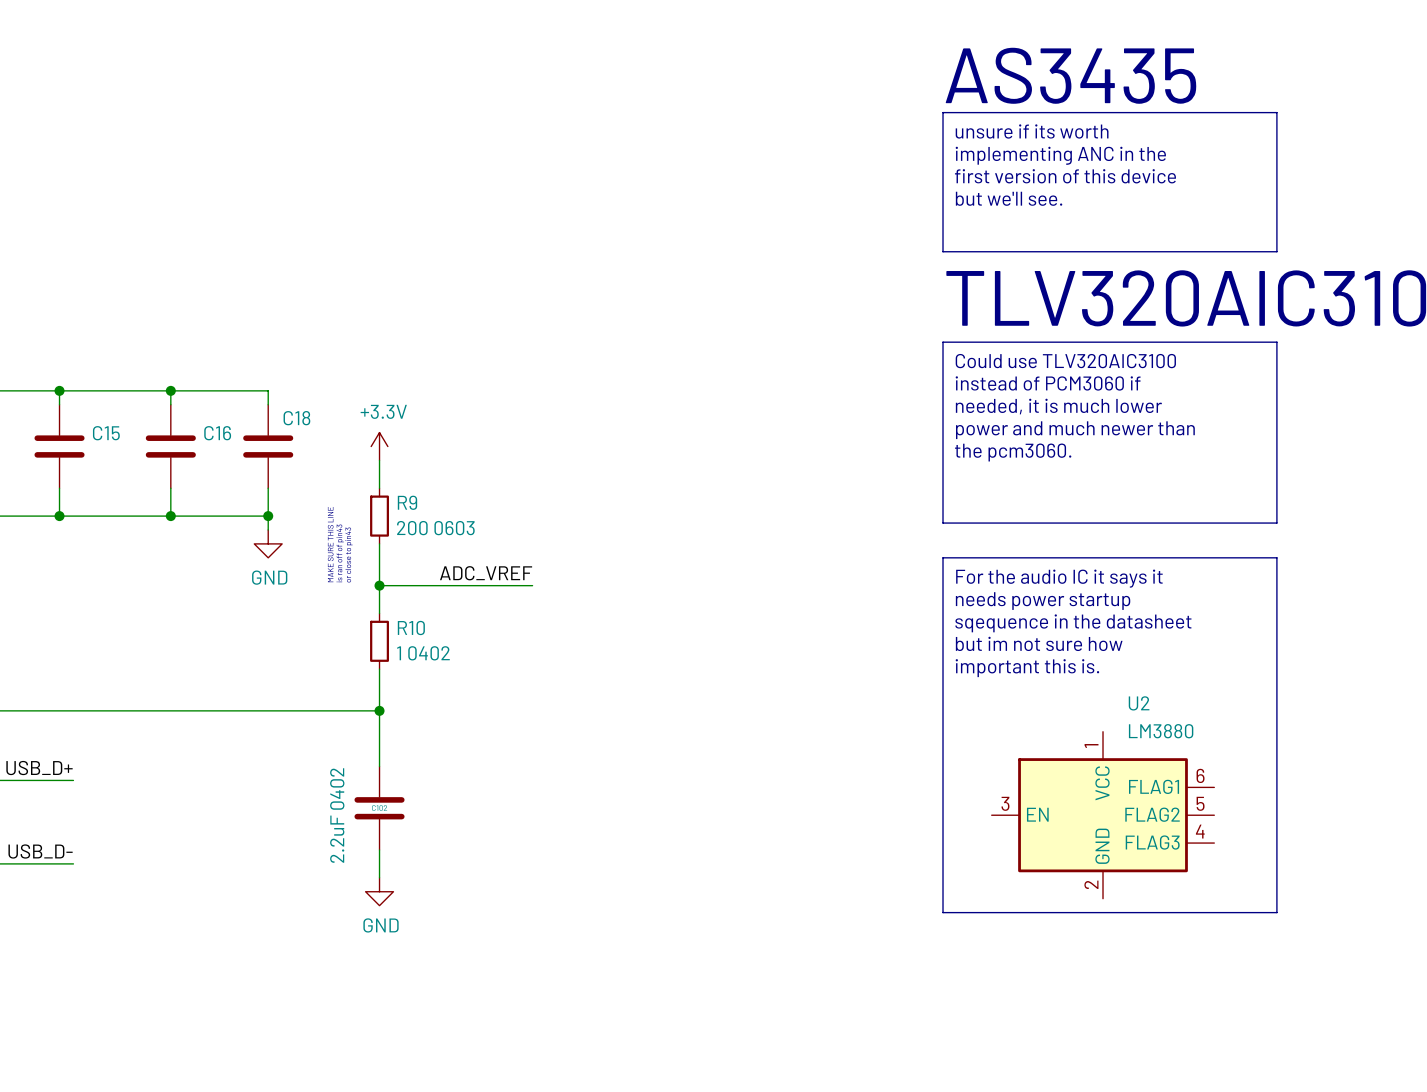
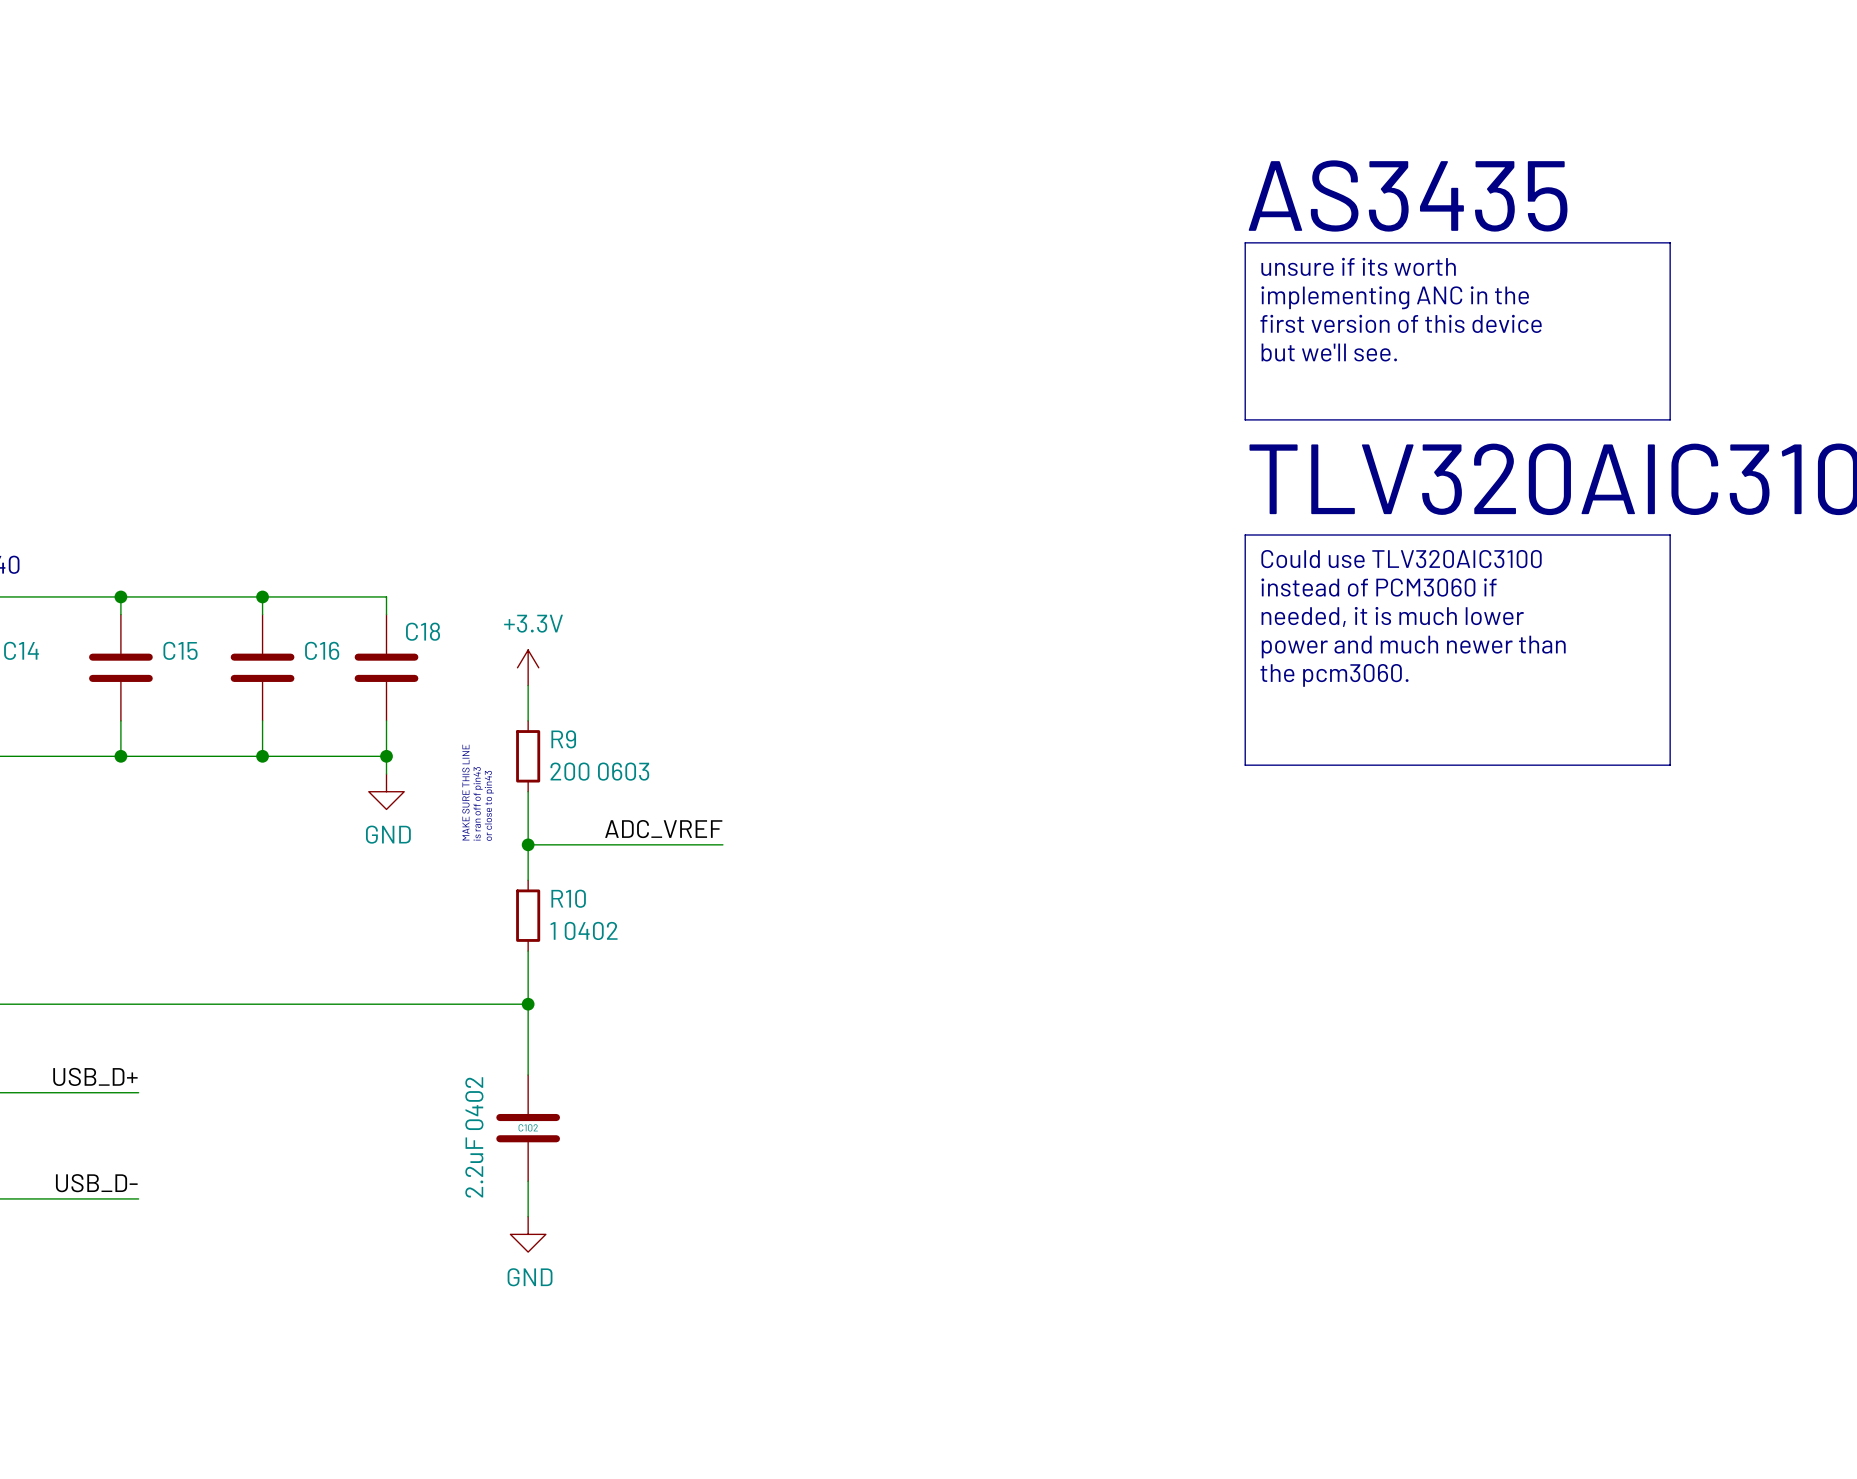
line: (943, 557) (1276, 557) (1276, 912) (943, 912) (943, 557) -> none
text: For the audio IC it says it (1059, 578) -> none
text: needs power startup (1043, 601) -> none
text: sqequence in the datasheet (1073, 623) -> none
text: but im not sure how (1039, 643) -> none
text: important this is. (1027, 668) -> none
U2: LM3880 (1103, 815) -> none

